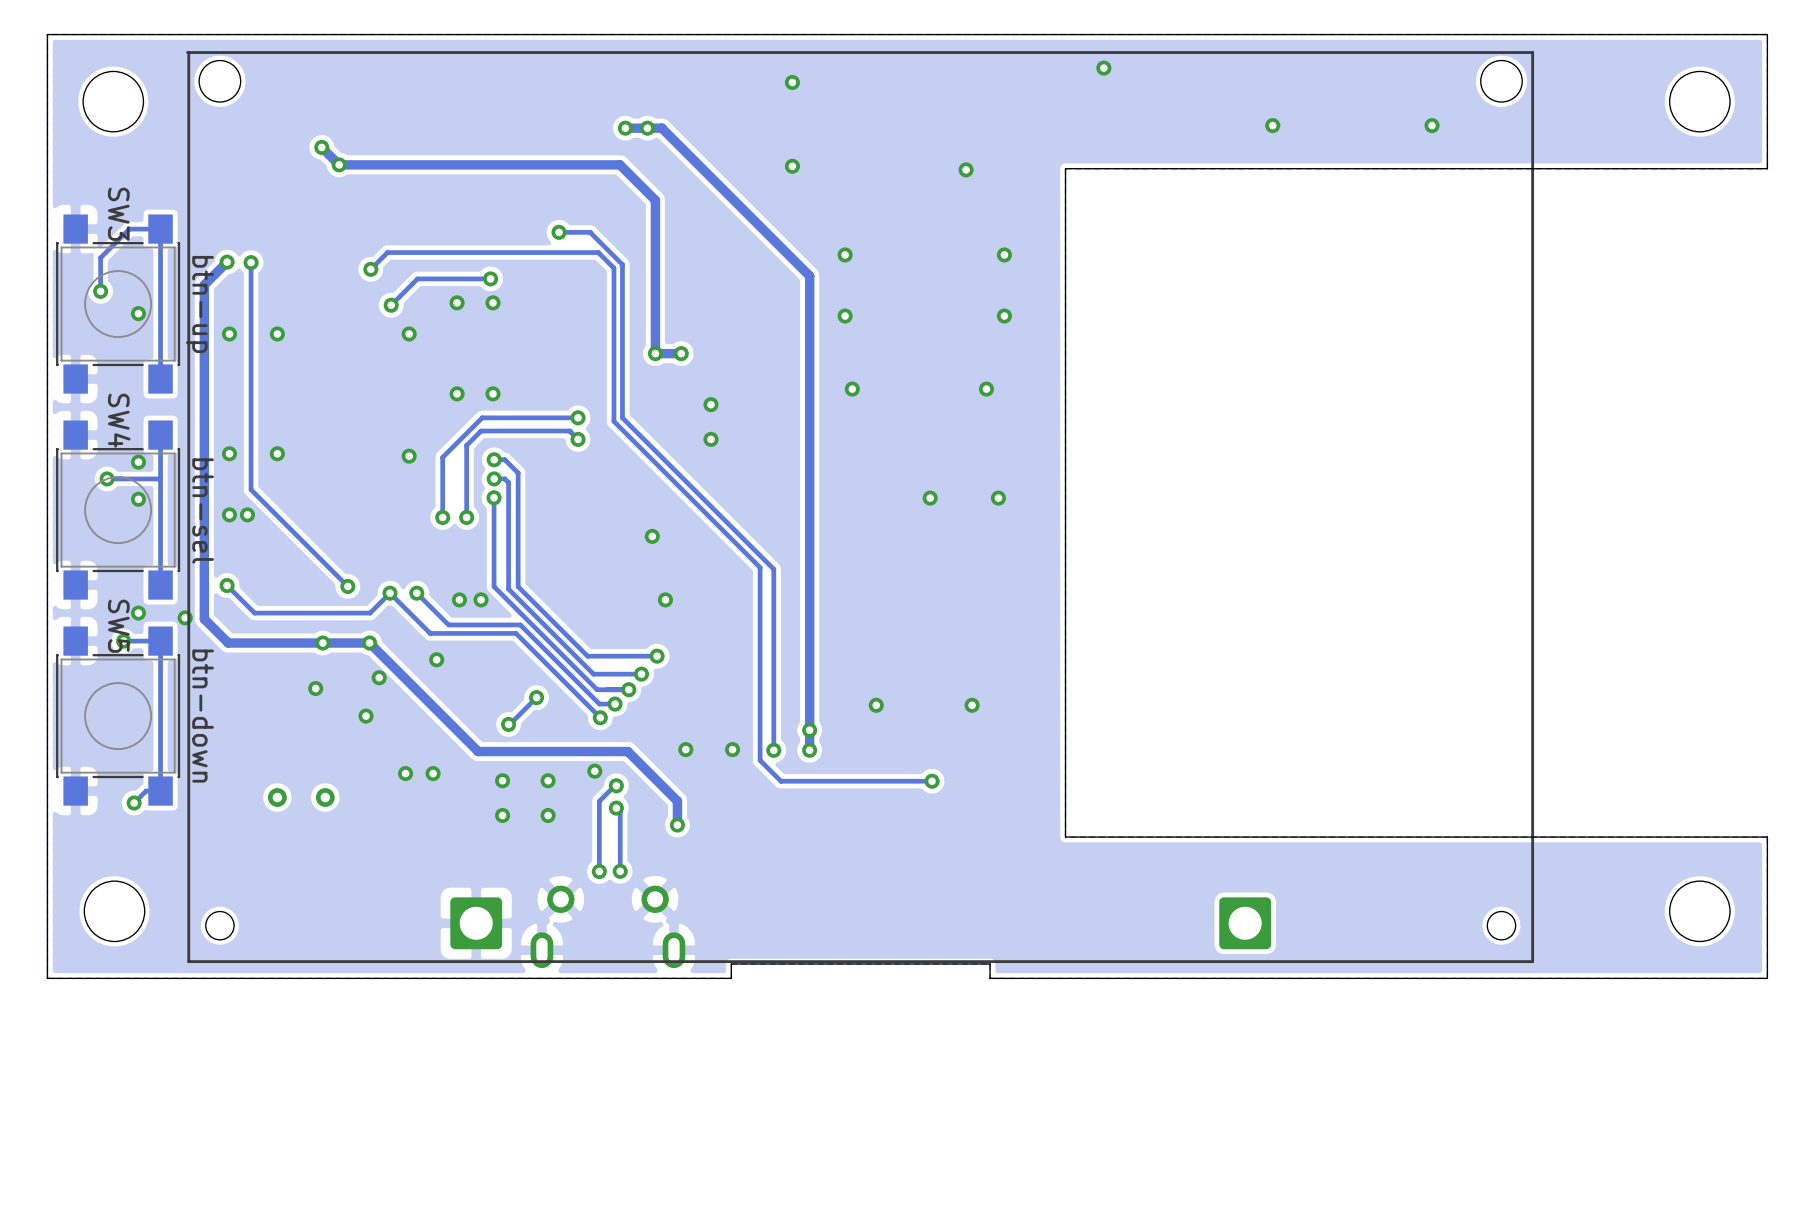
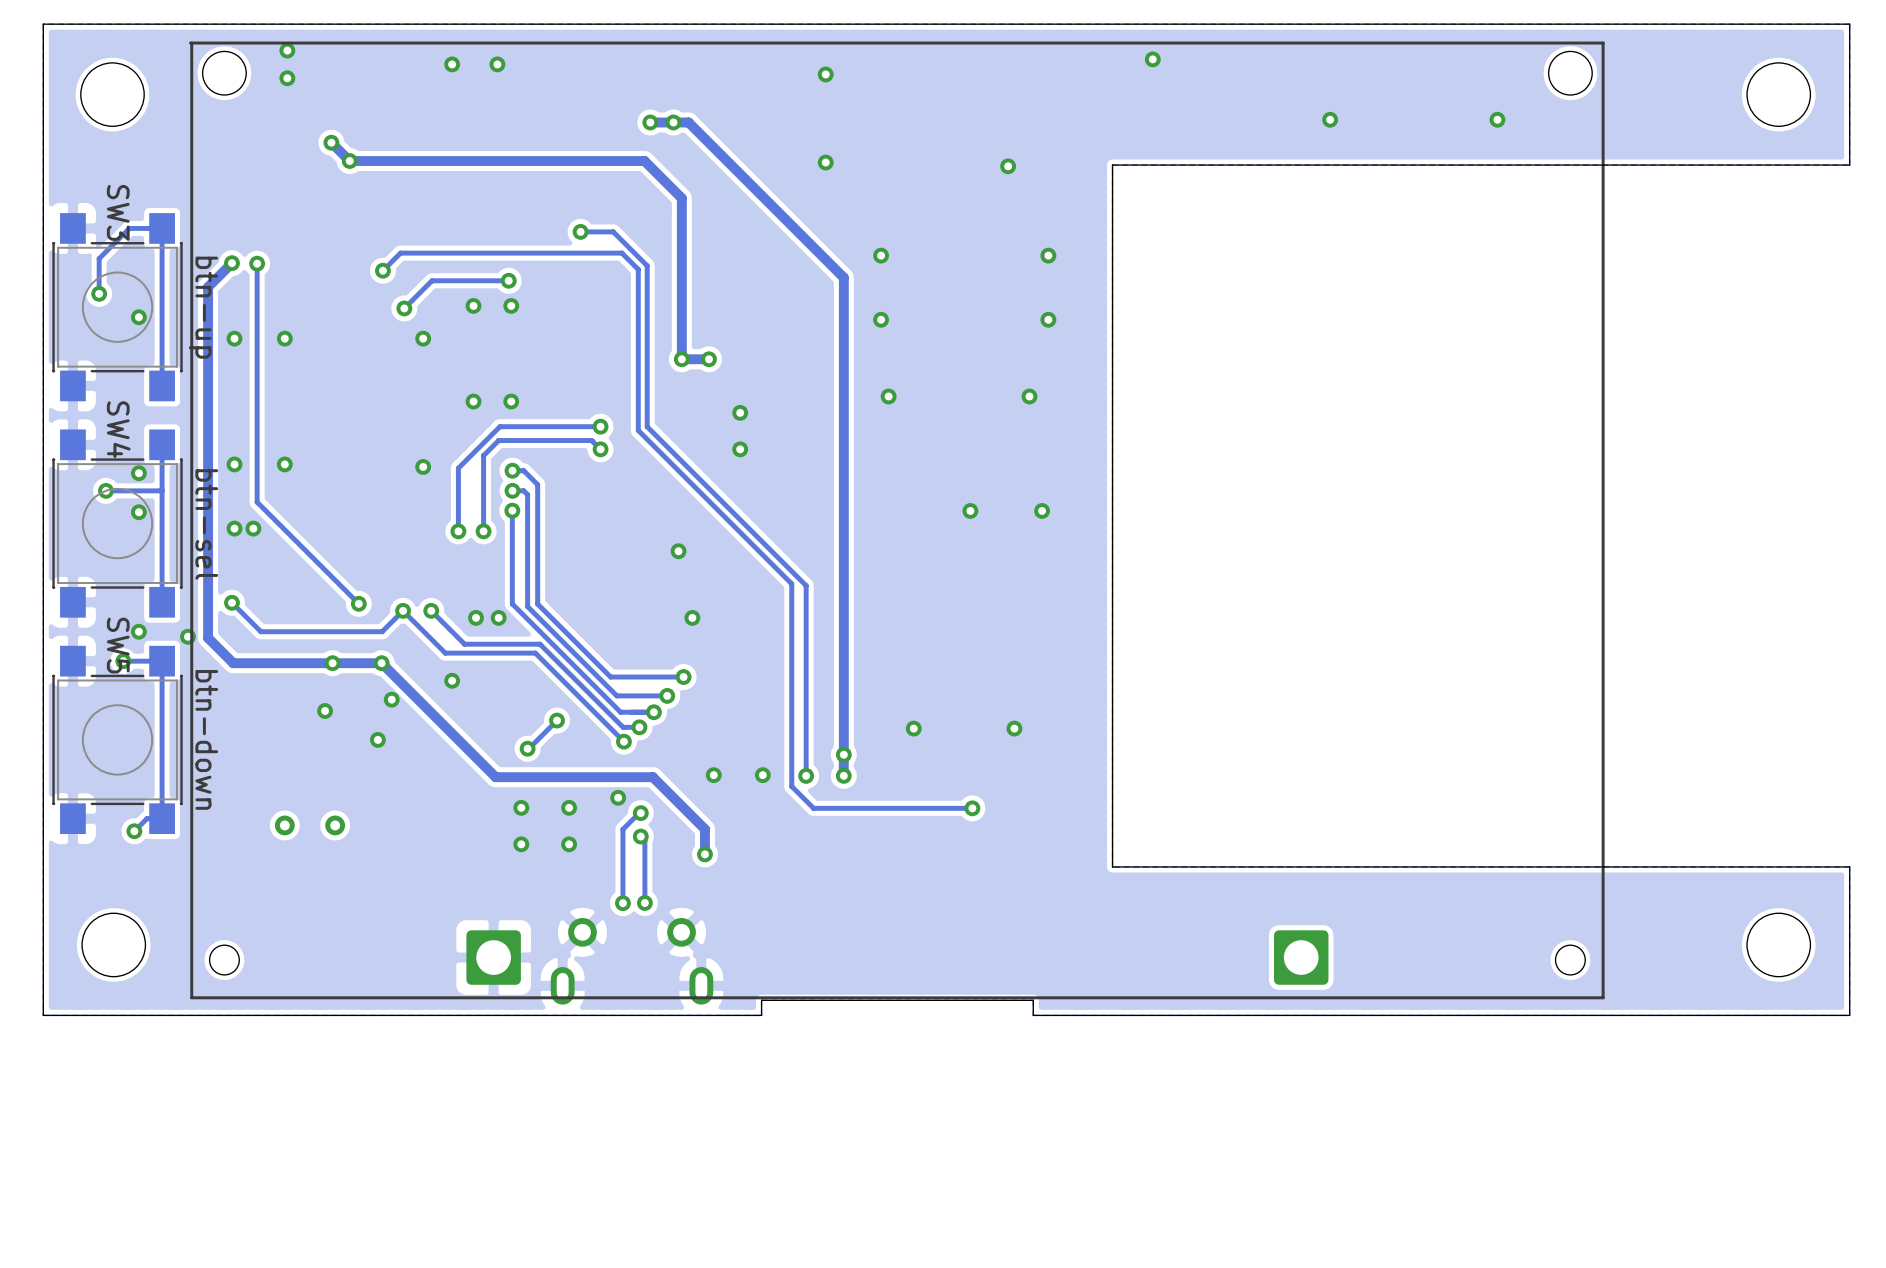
via: none -> (287, 50)
via: none -> (452, 64)
via: none -> (497, 64)
via: none -> (287, 78)
via: (405, 773) -> none
via: (433, 773) -> none

